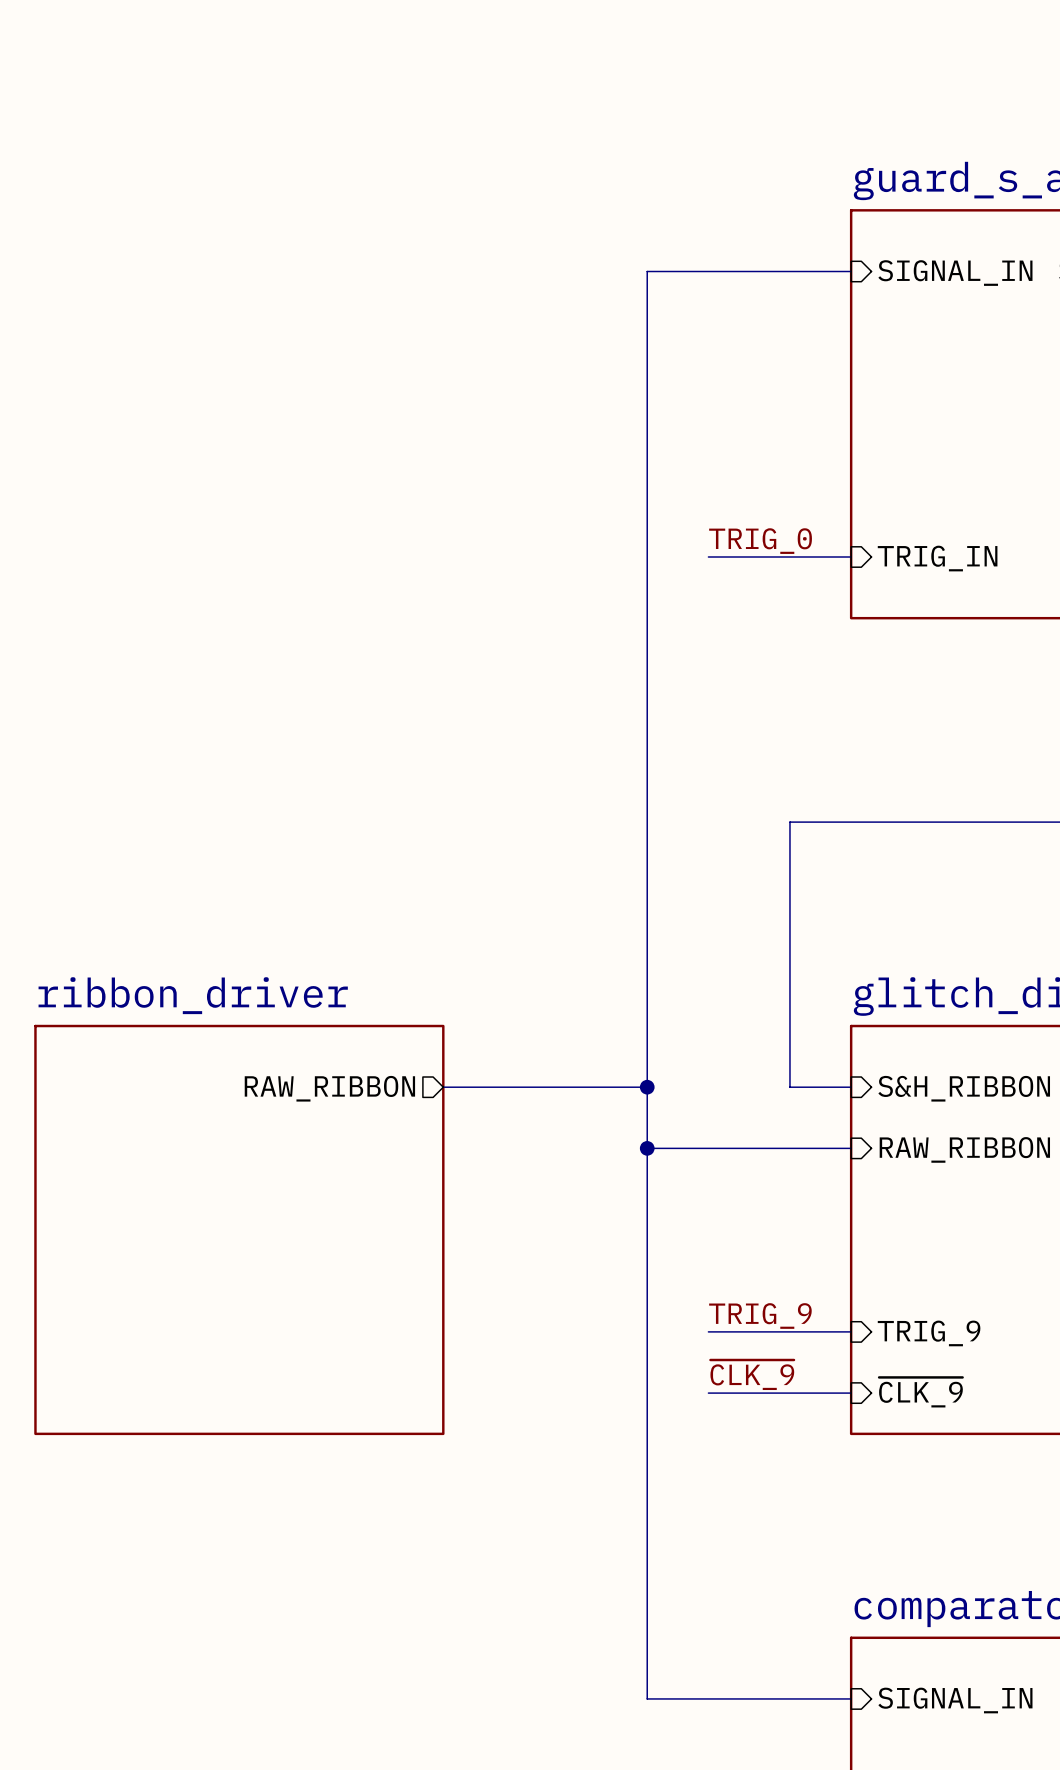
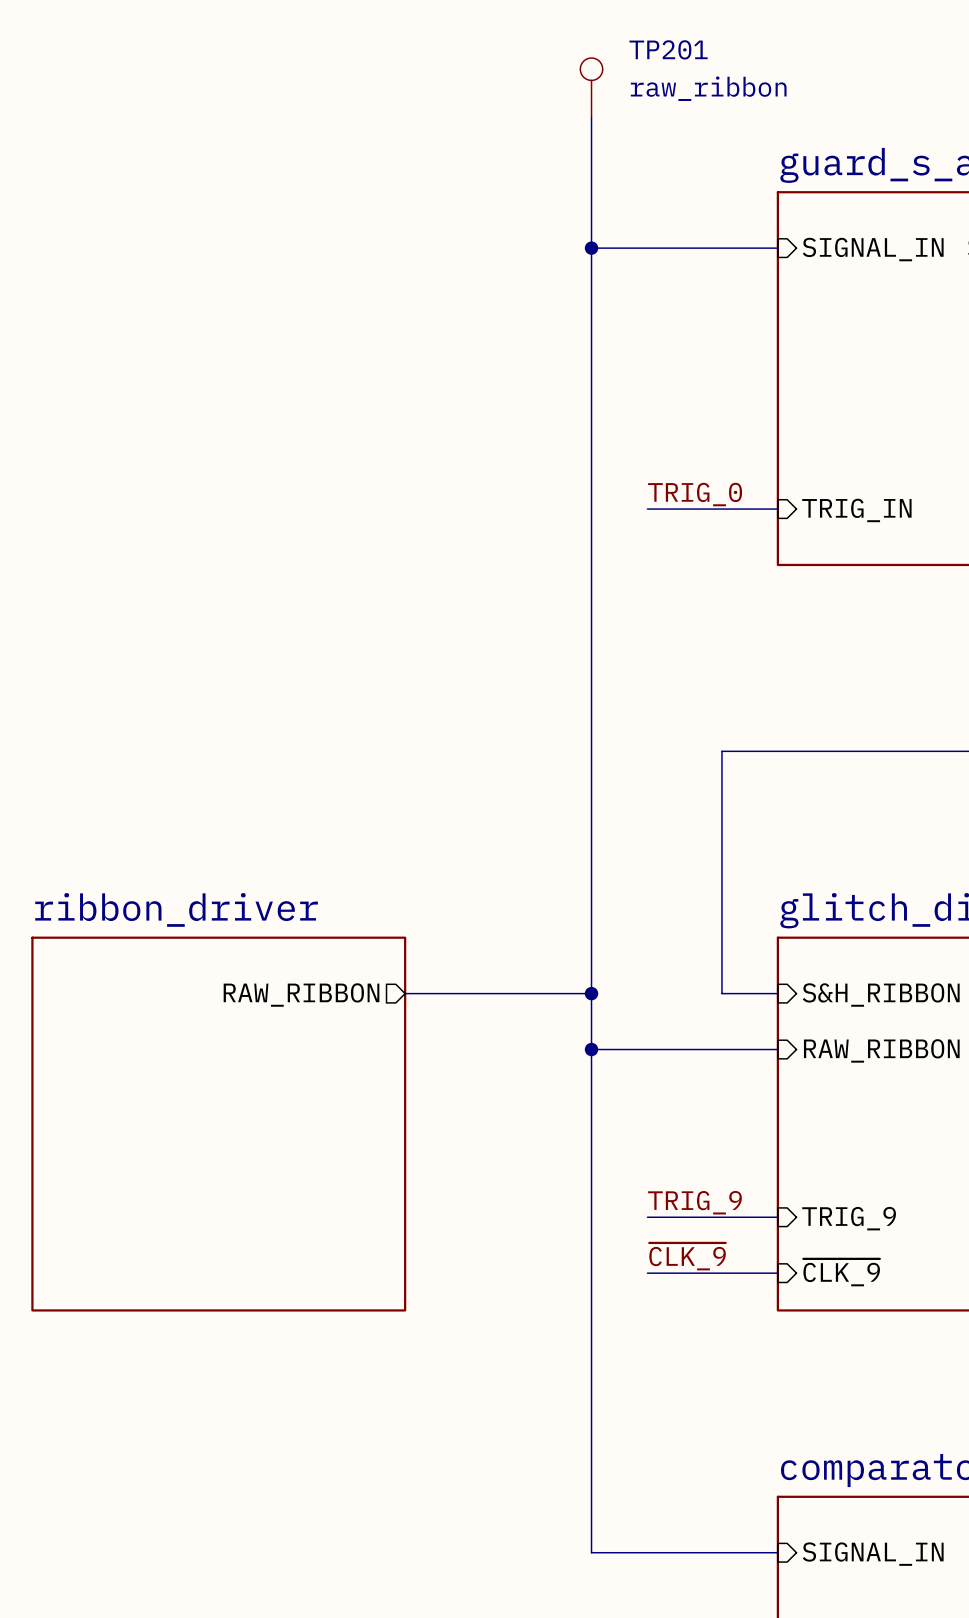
TP201: none -> raw_ribbon (591, 87)
wire: none -> (591, 117) (591, 248)
junction: none -> (591, 248)

